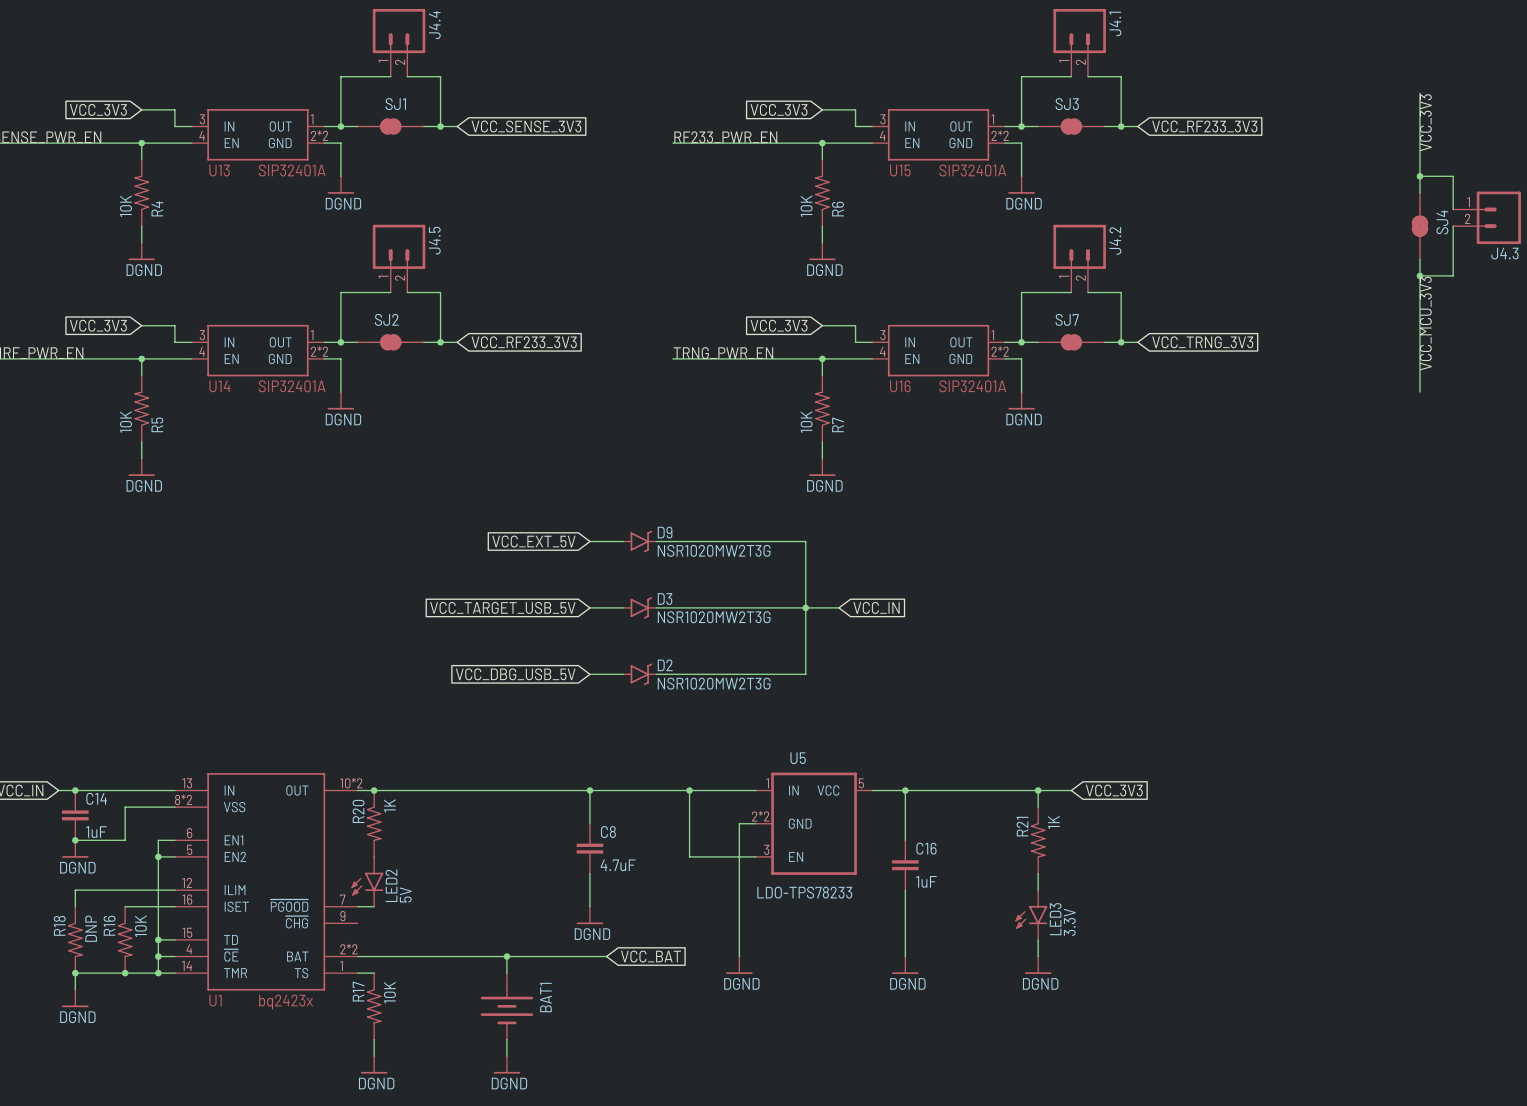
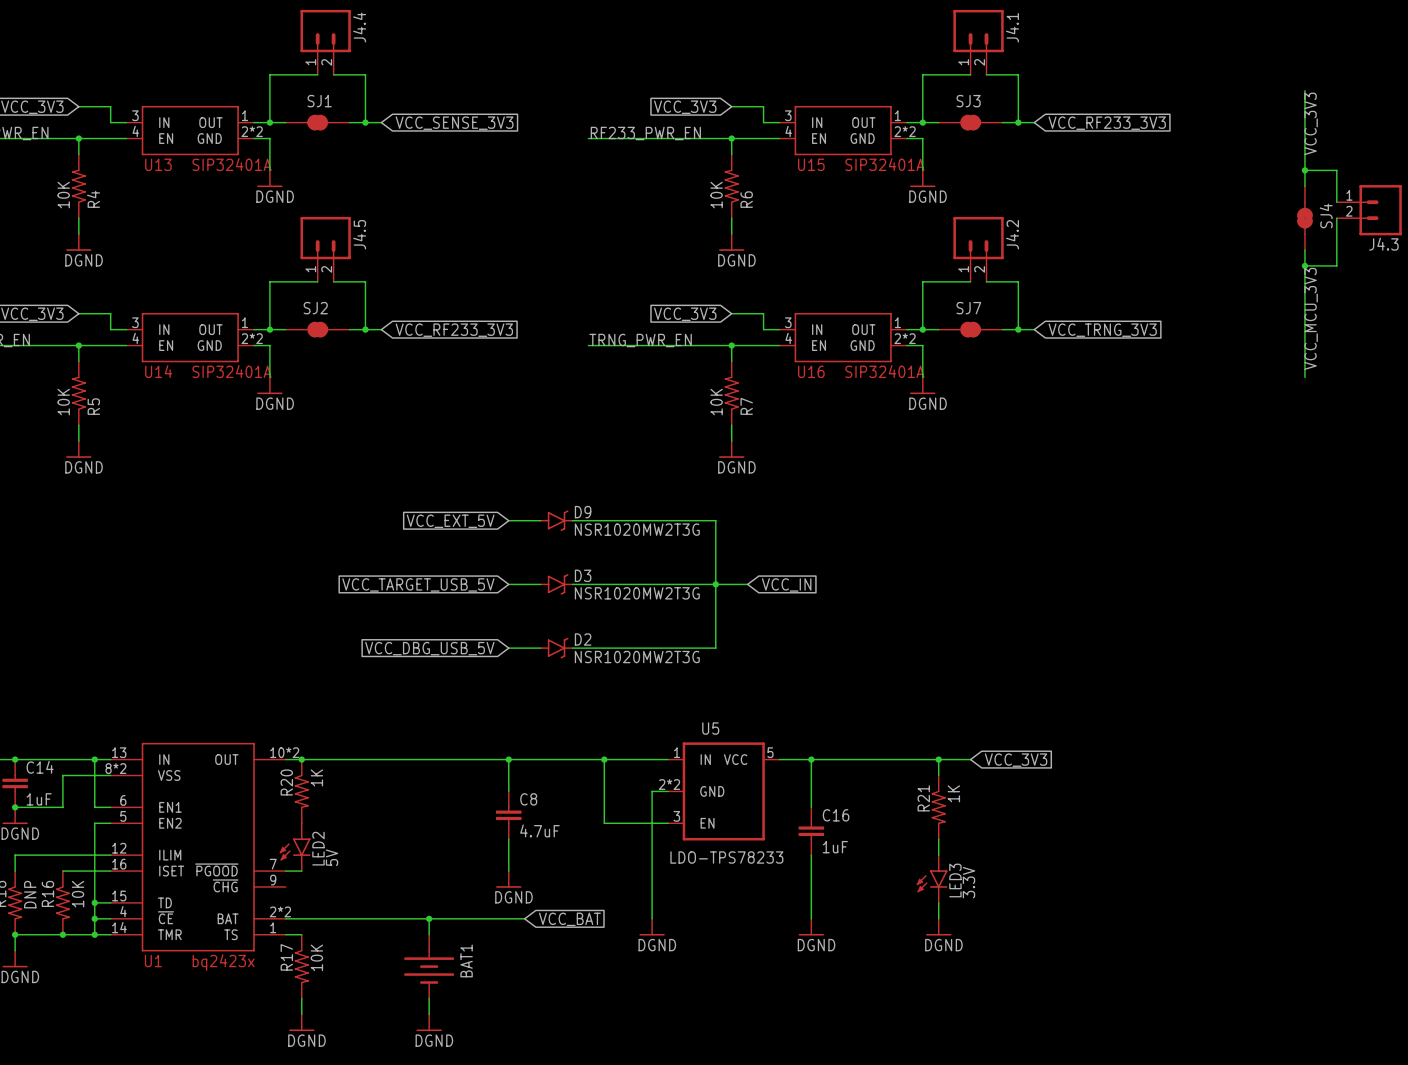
junction: none -> (94, 759)
wire: (158, 840) (158, 856) -> (94, 807) (94, 759)
junction: (158, 856) -> none

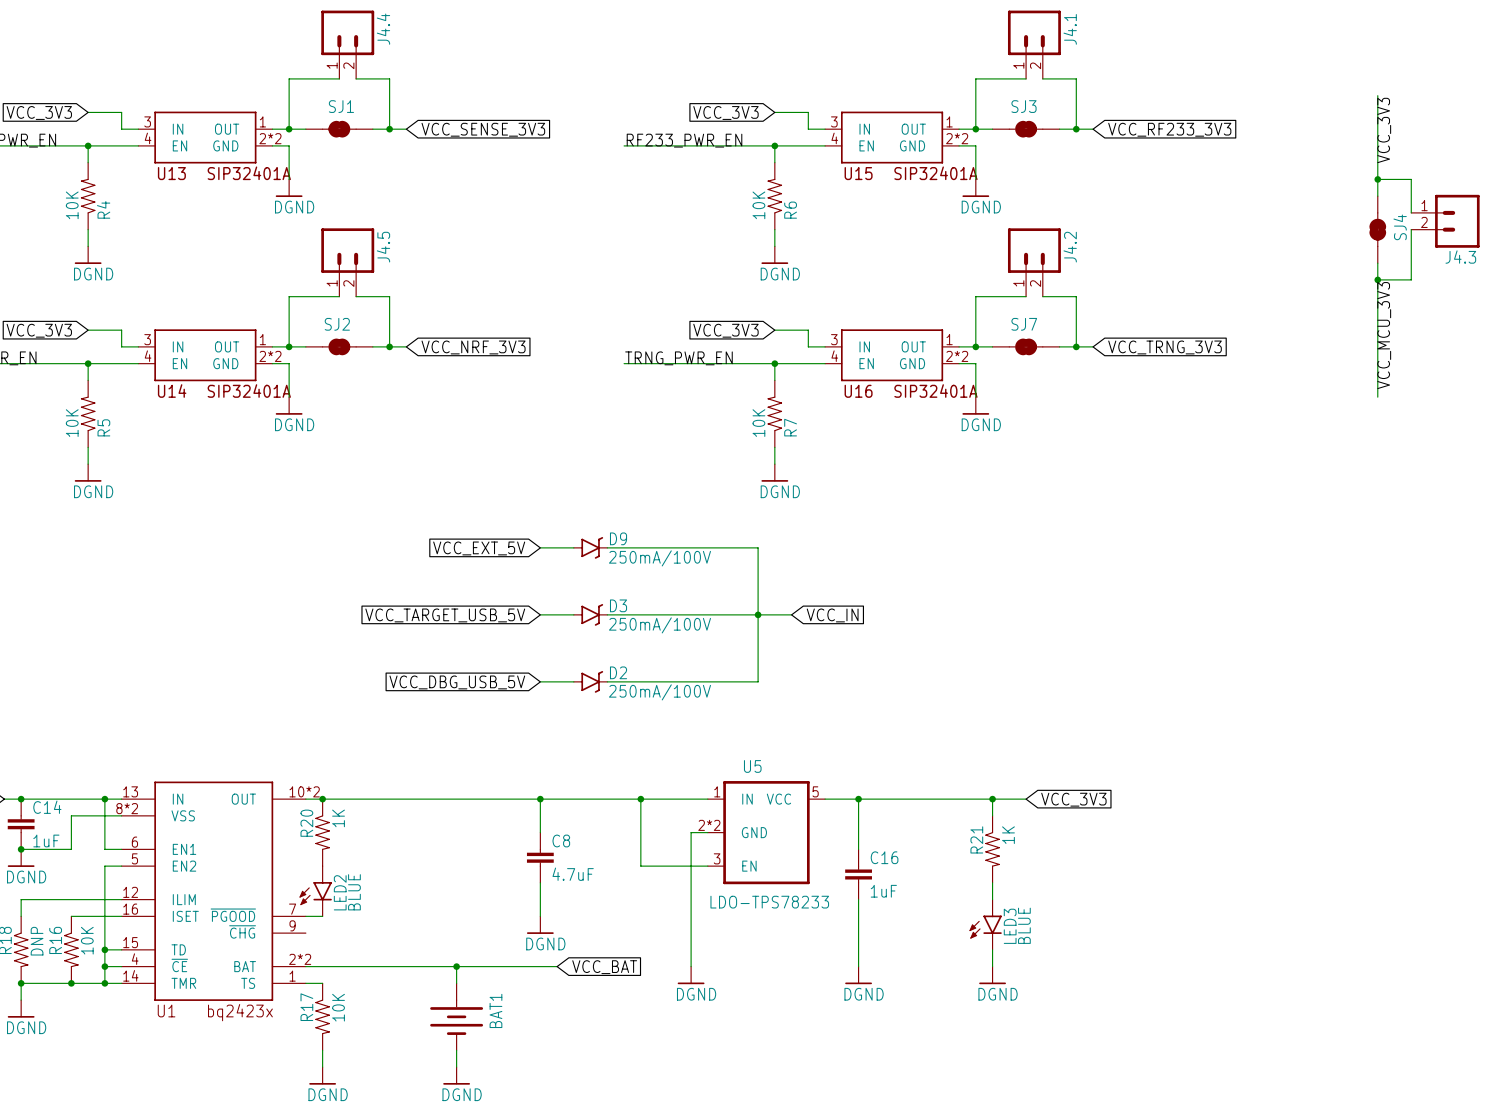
global label: VCC_RF233_3V3 (454, 330) -> VCC_NRF_3V3 (473, 347)
D9 value: NSR1020MW2T3G (637, 529) -> 250mA/100V (659, 558)
D3 value: NSR1020MW2T3G (637, 593) -> 250mA/100V (659, 625)
D2 value: NSR1020MW2T3G (637, 657) -> 250mA/100V (659, 692)
LED2 value: 5V (332, 857) -> BLUE (354, 892)
LED3 value: 3.3V (968, 882) -> BLUE (1024, 925)

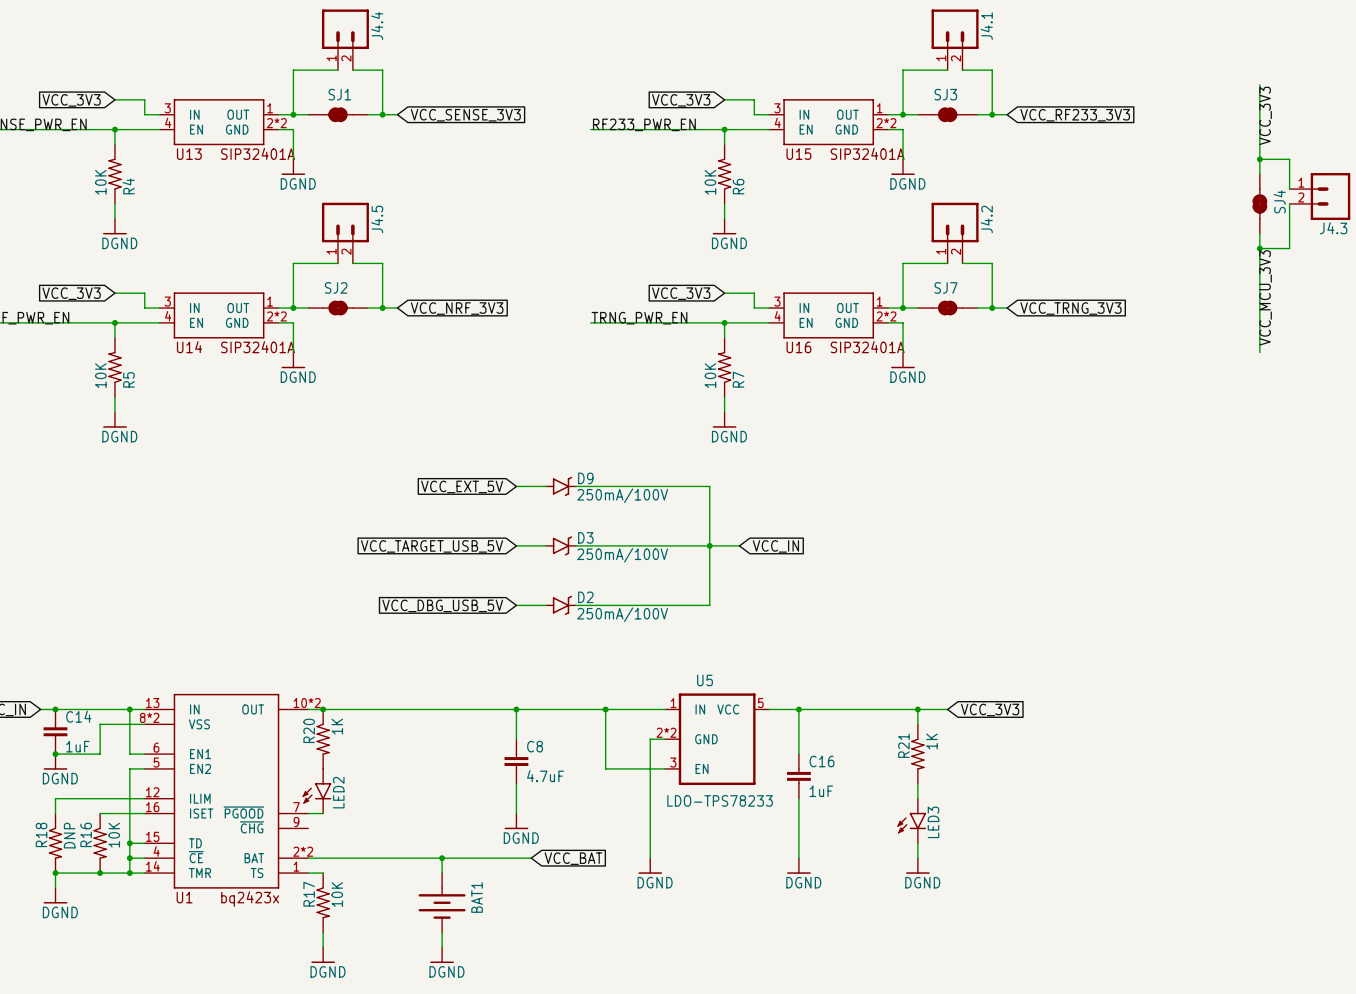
LED2 value: BLUE (354, 892) -> none
LED3 value: BLUE (1024, 925) -> none

